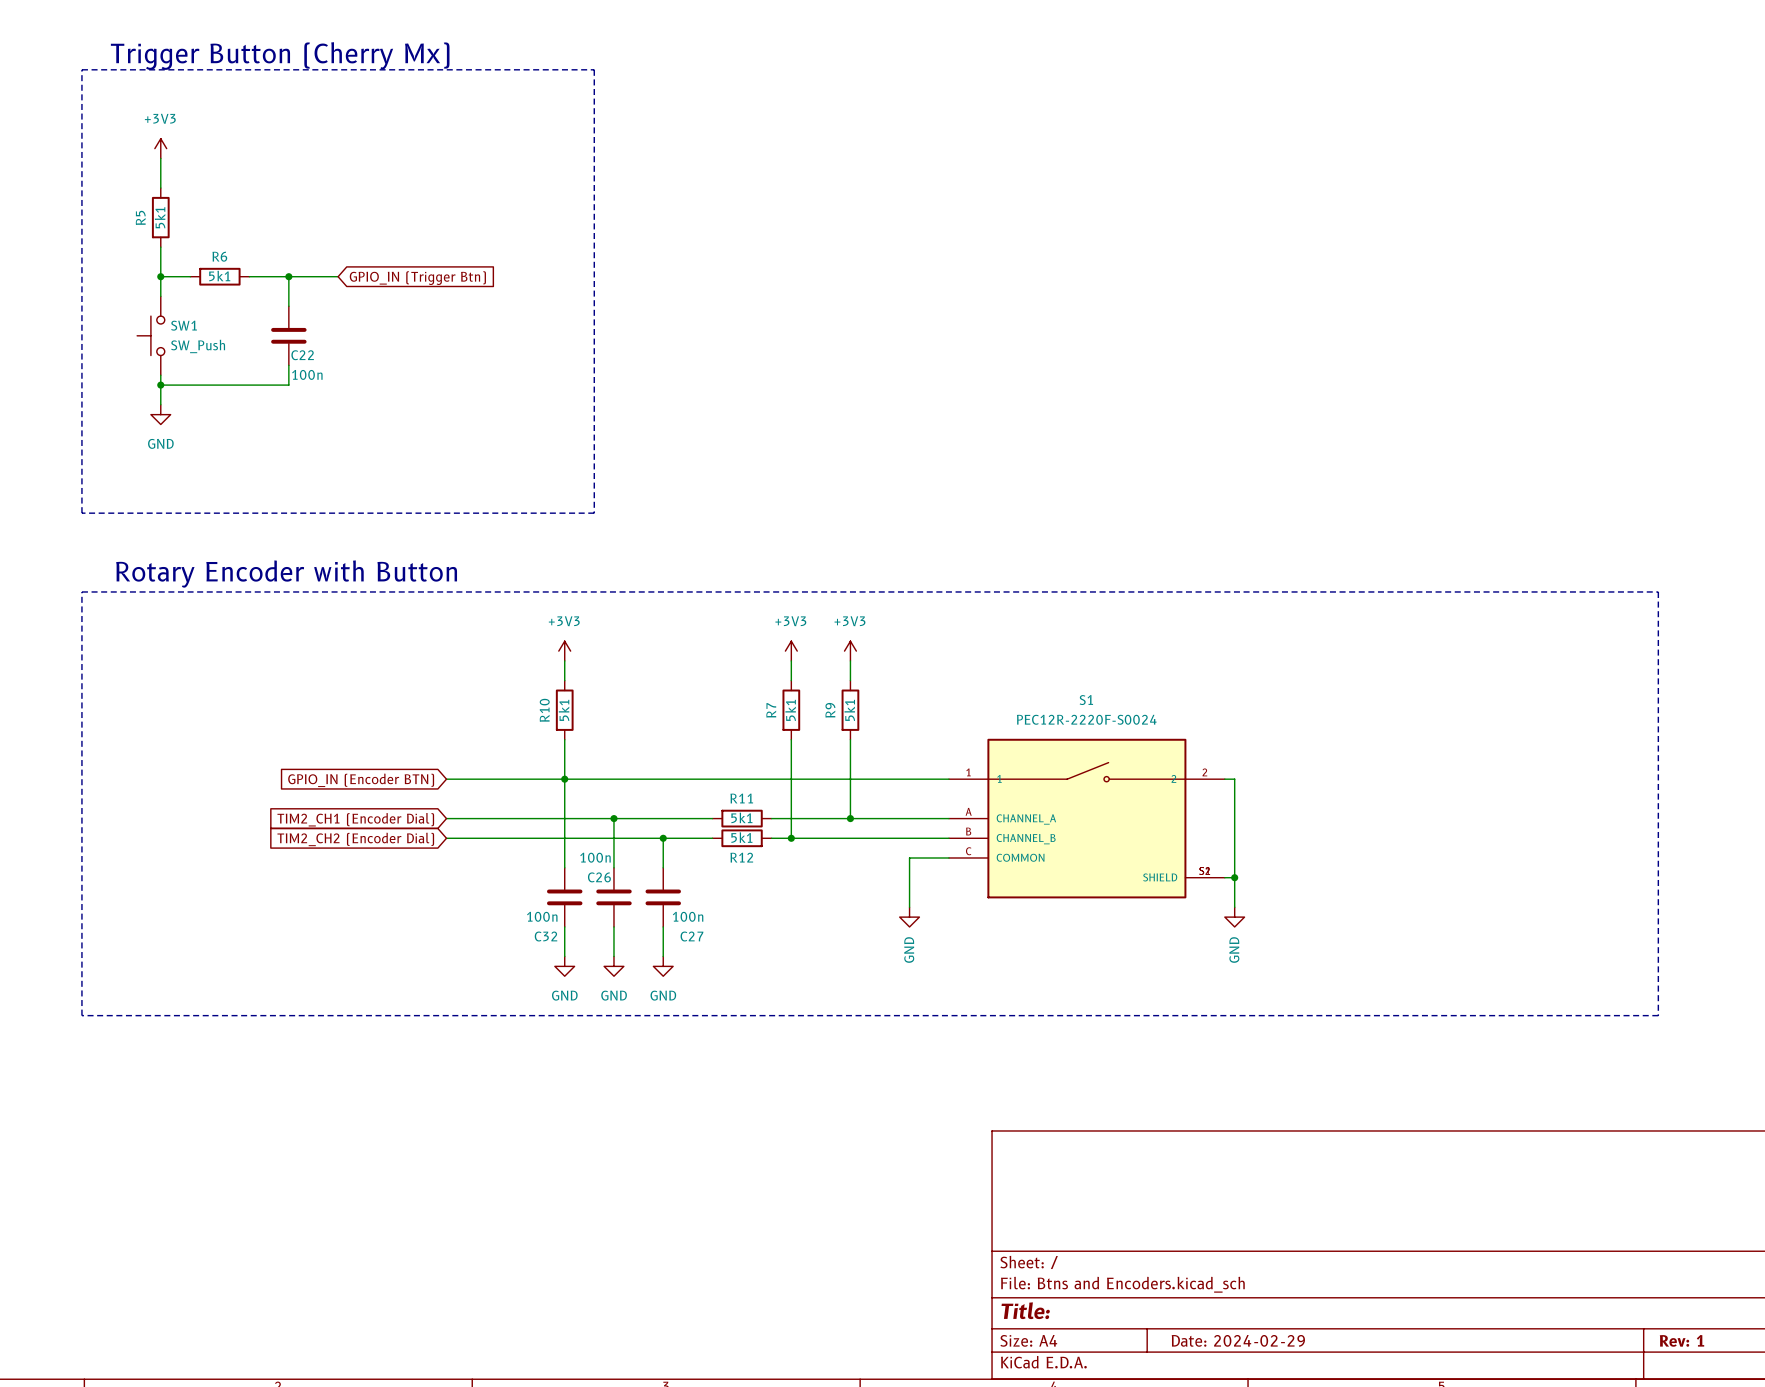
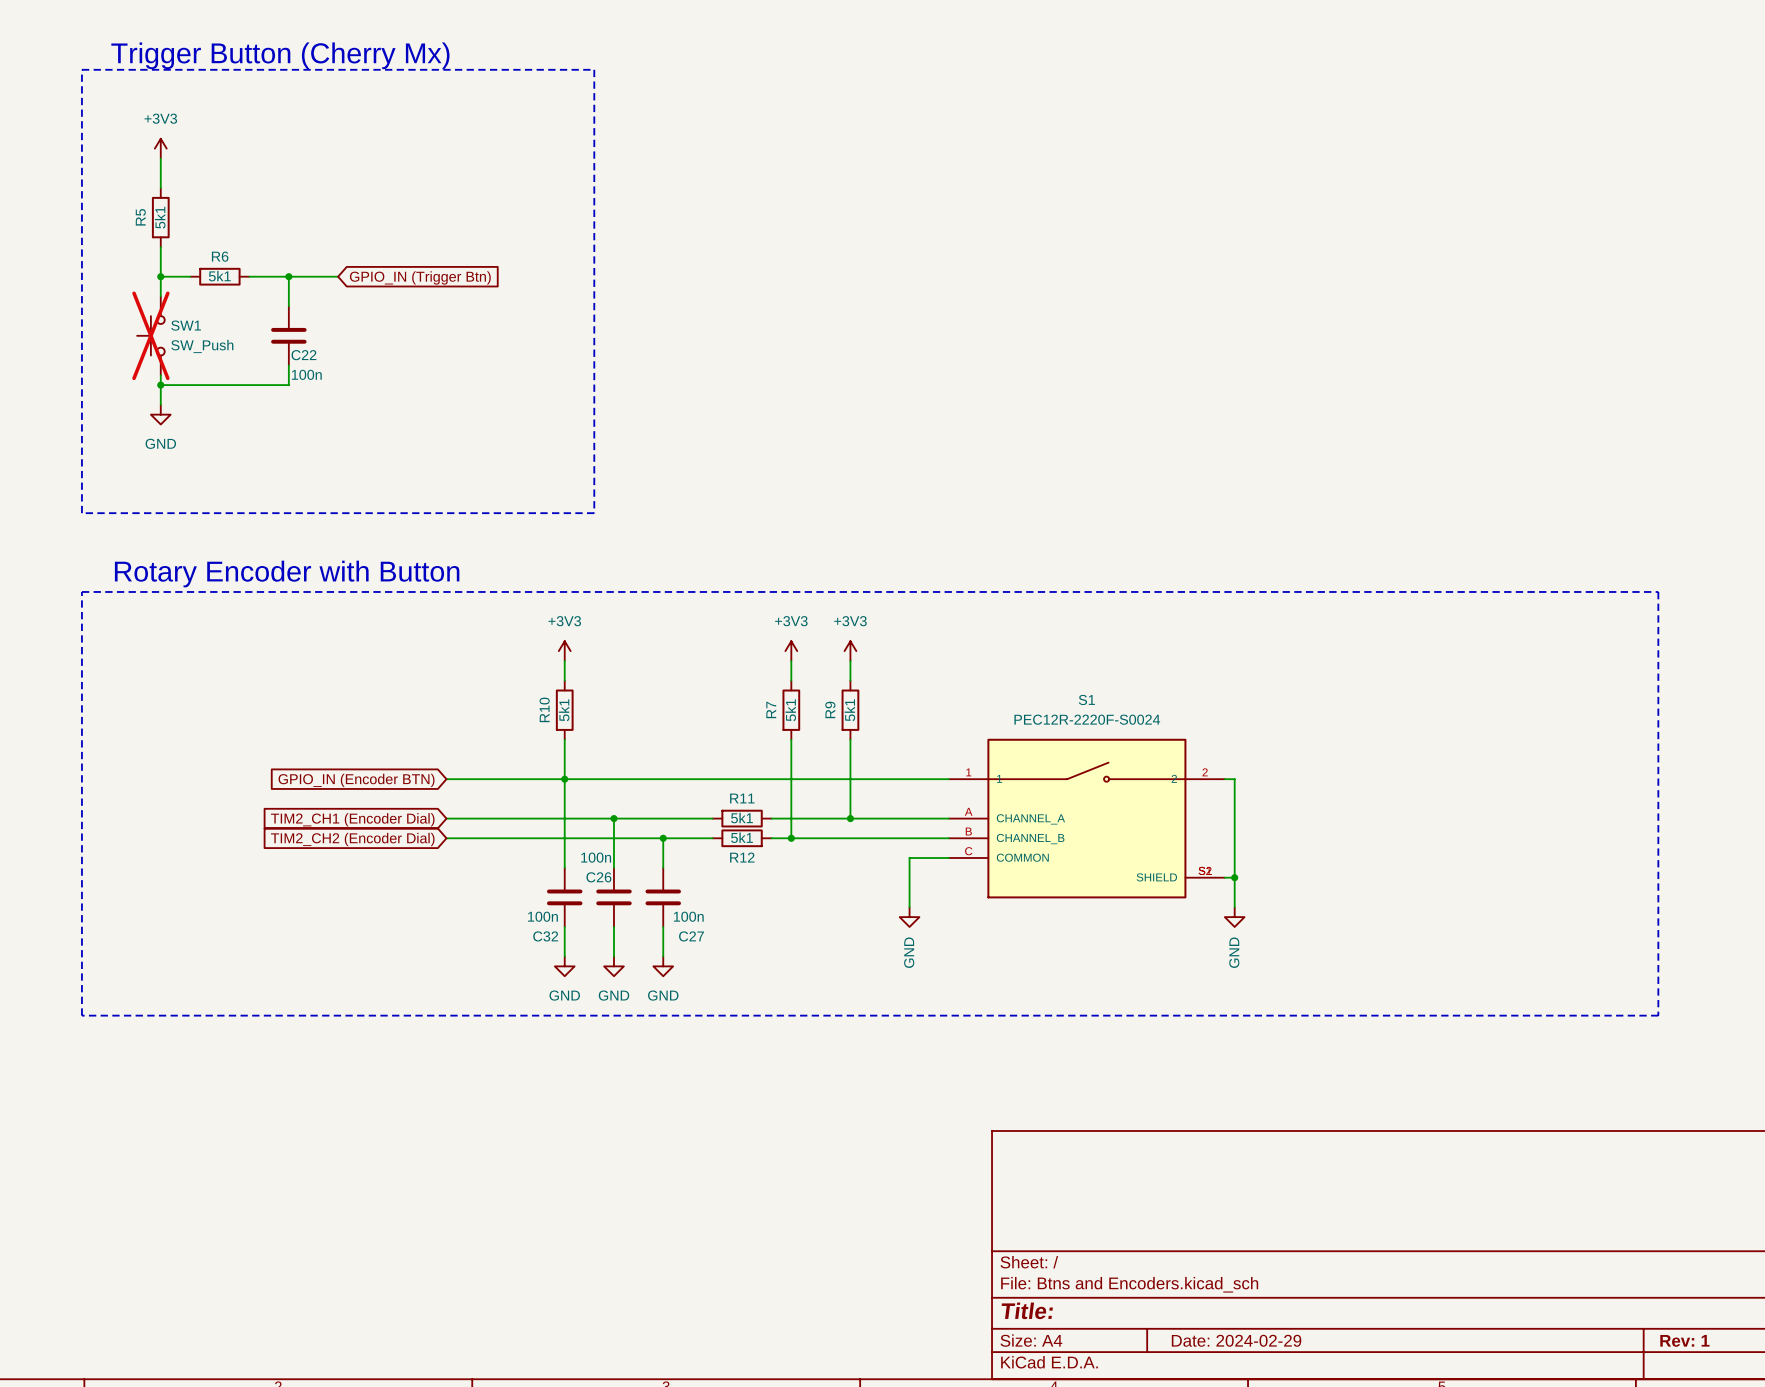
SW1 do-not-place cross: none -> (150, 335)

